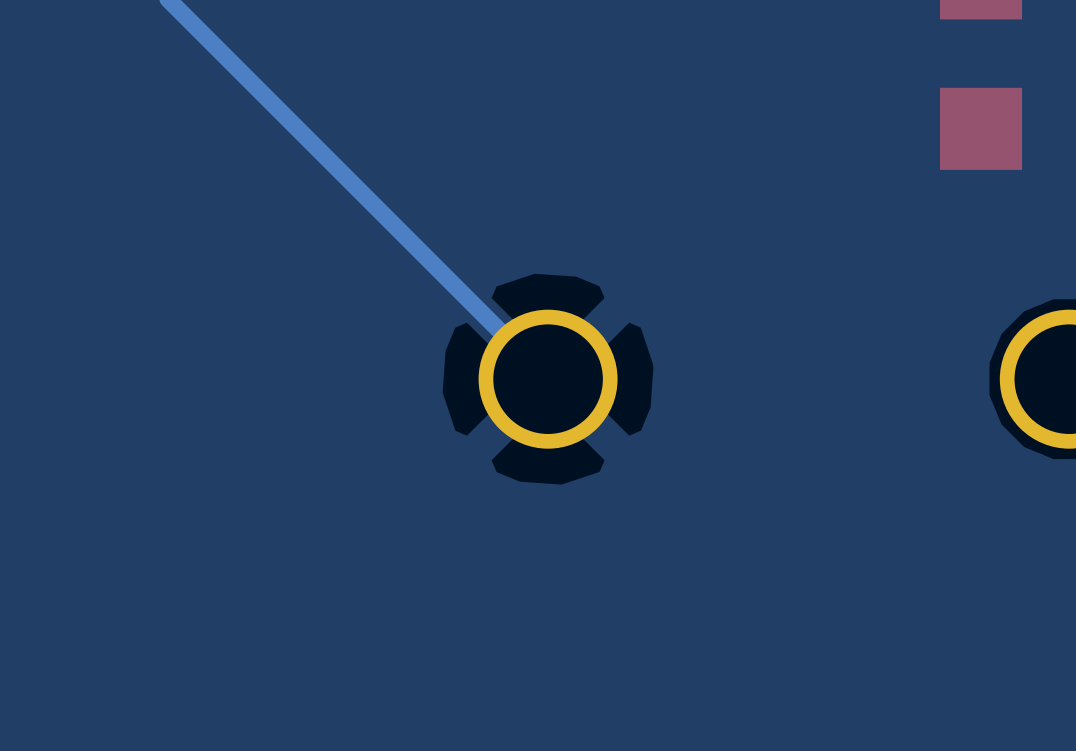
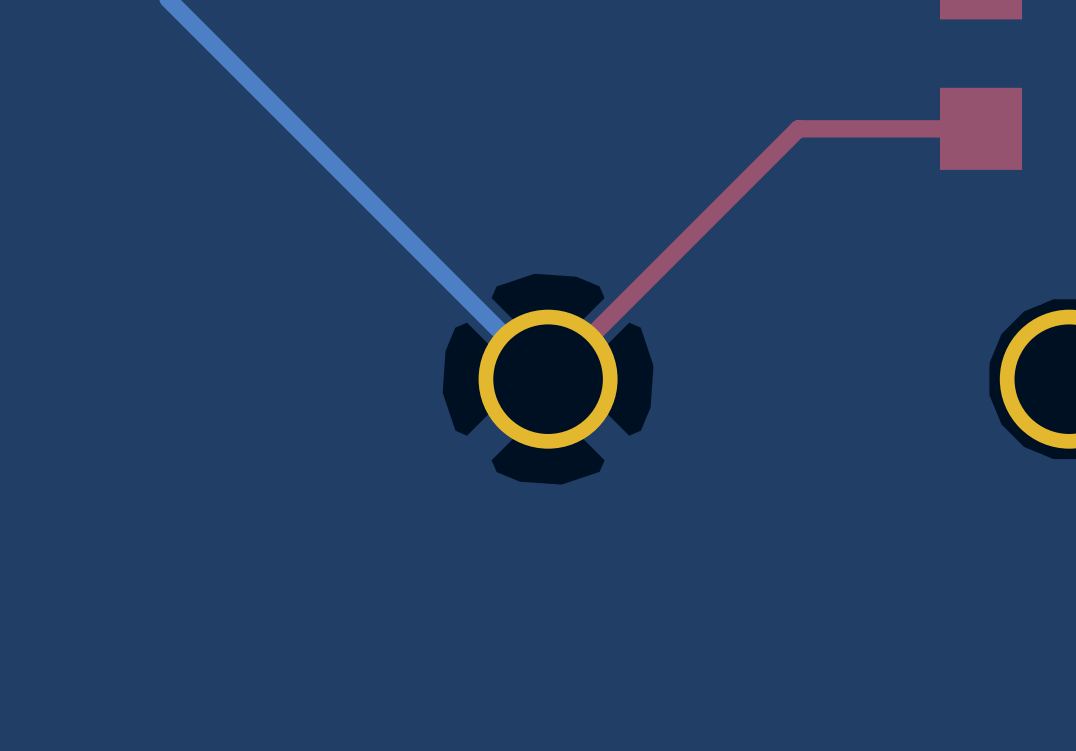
top track: none -> (981, 128) (798, 128) (548, 379)

